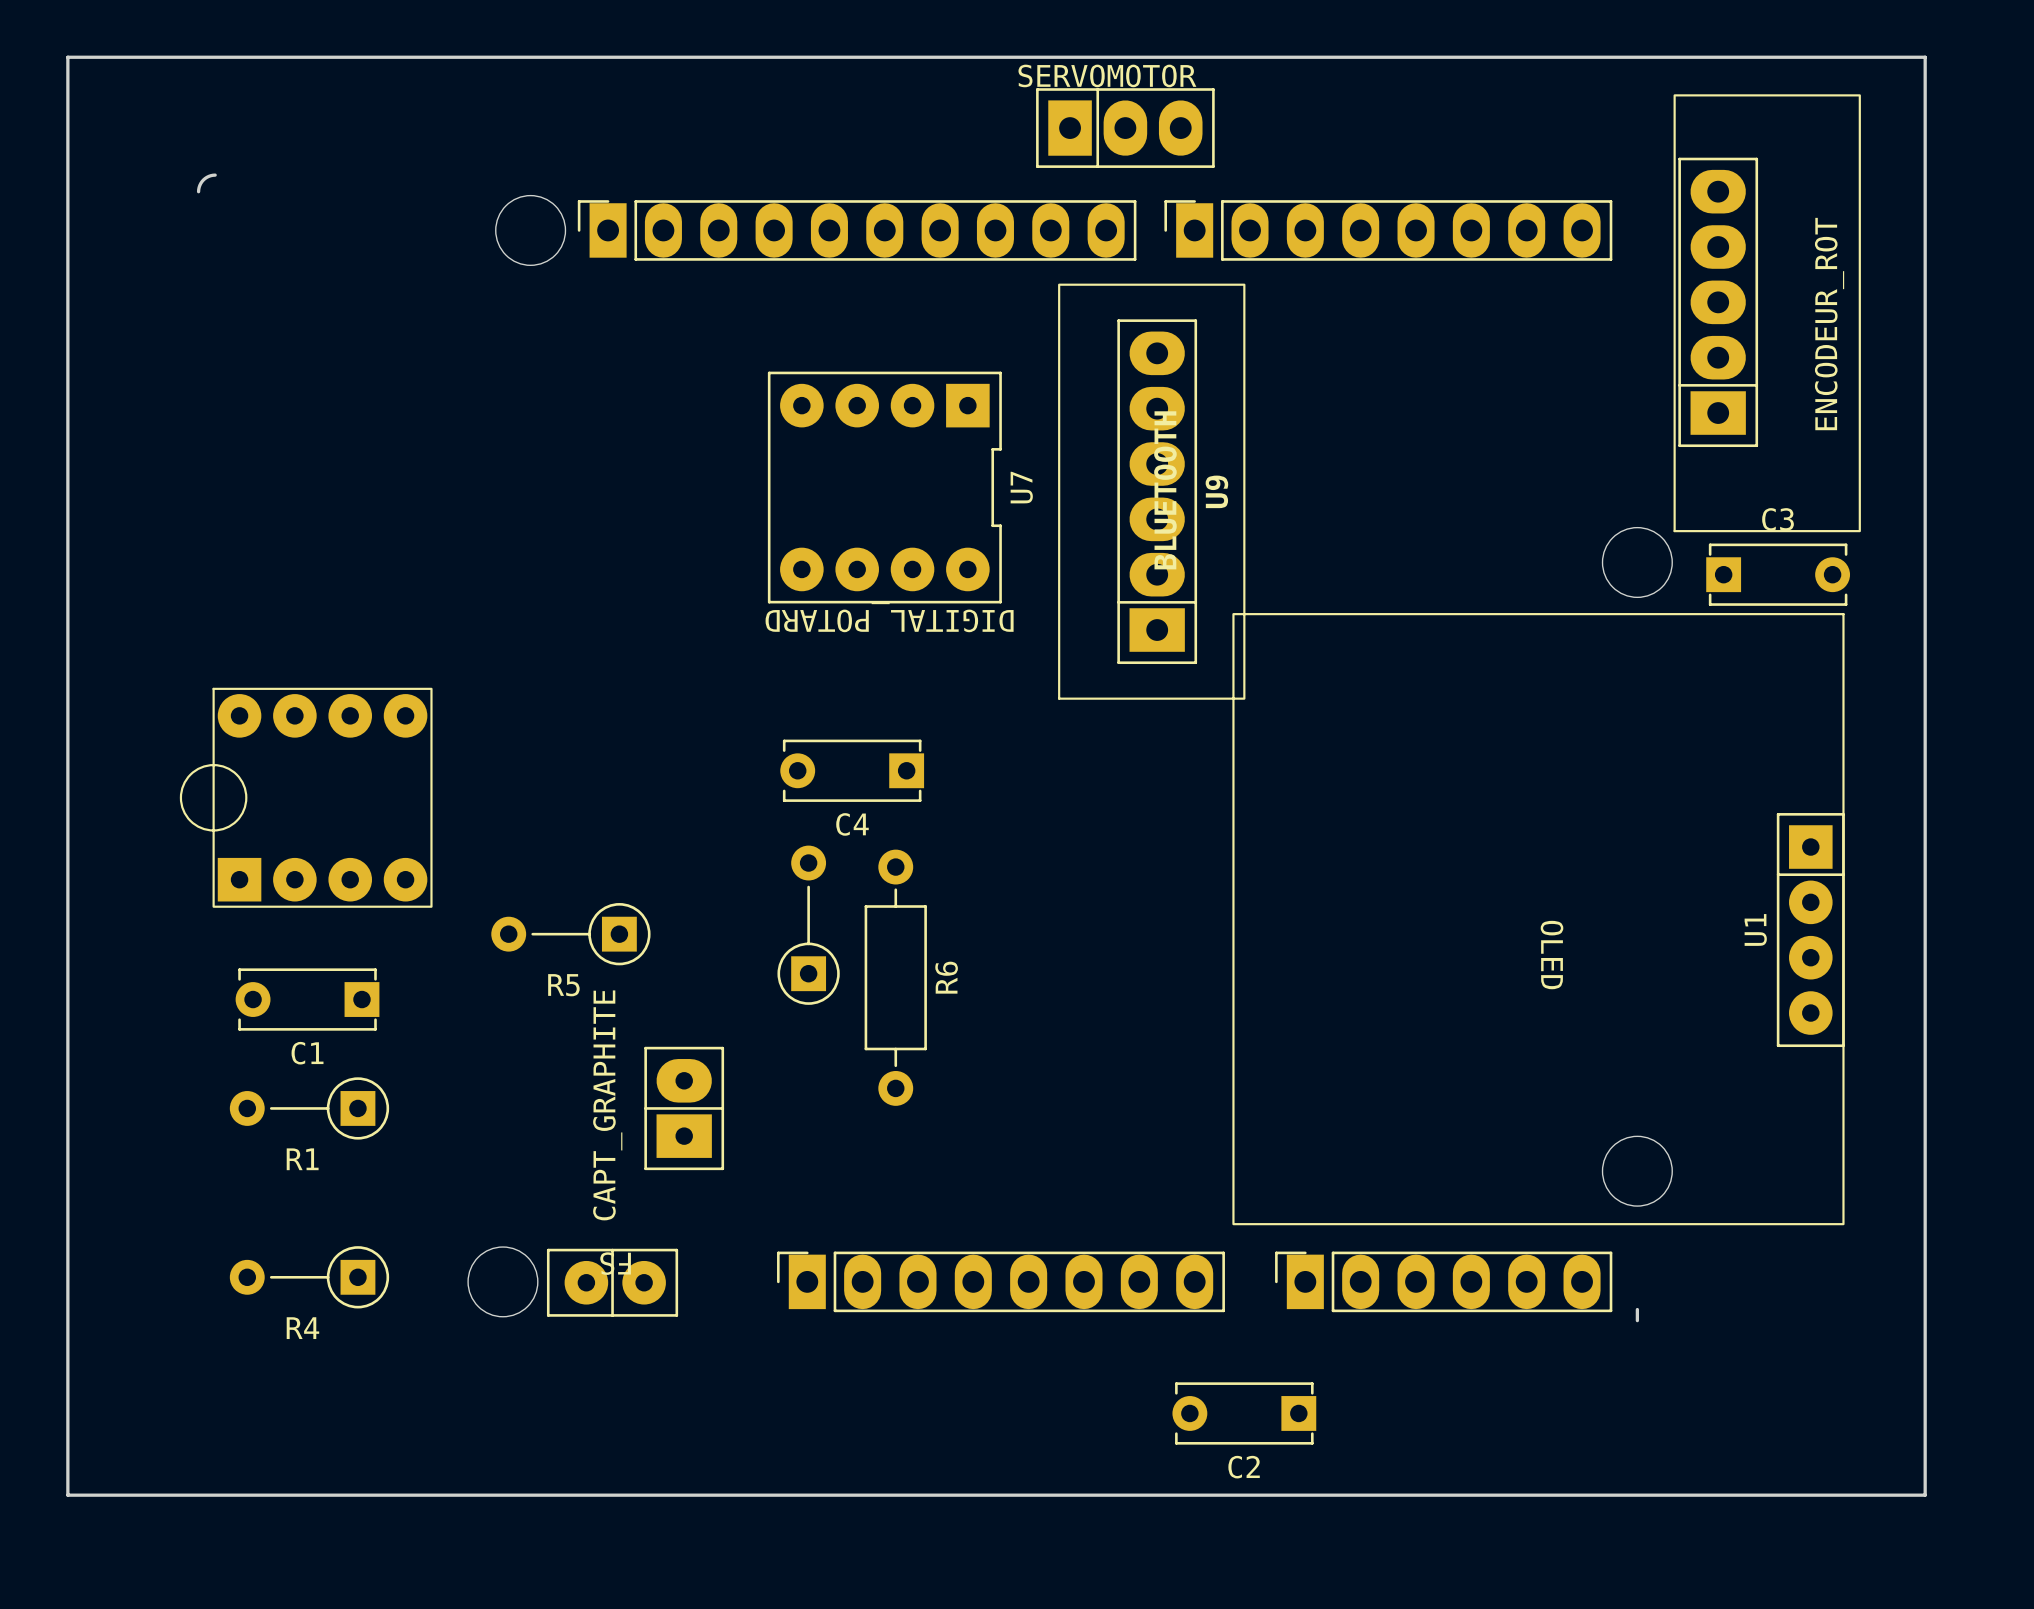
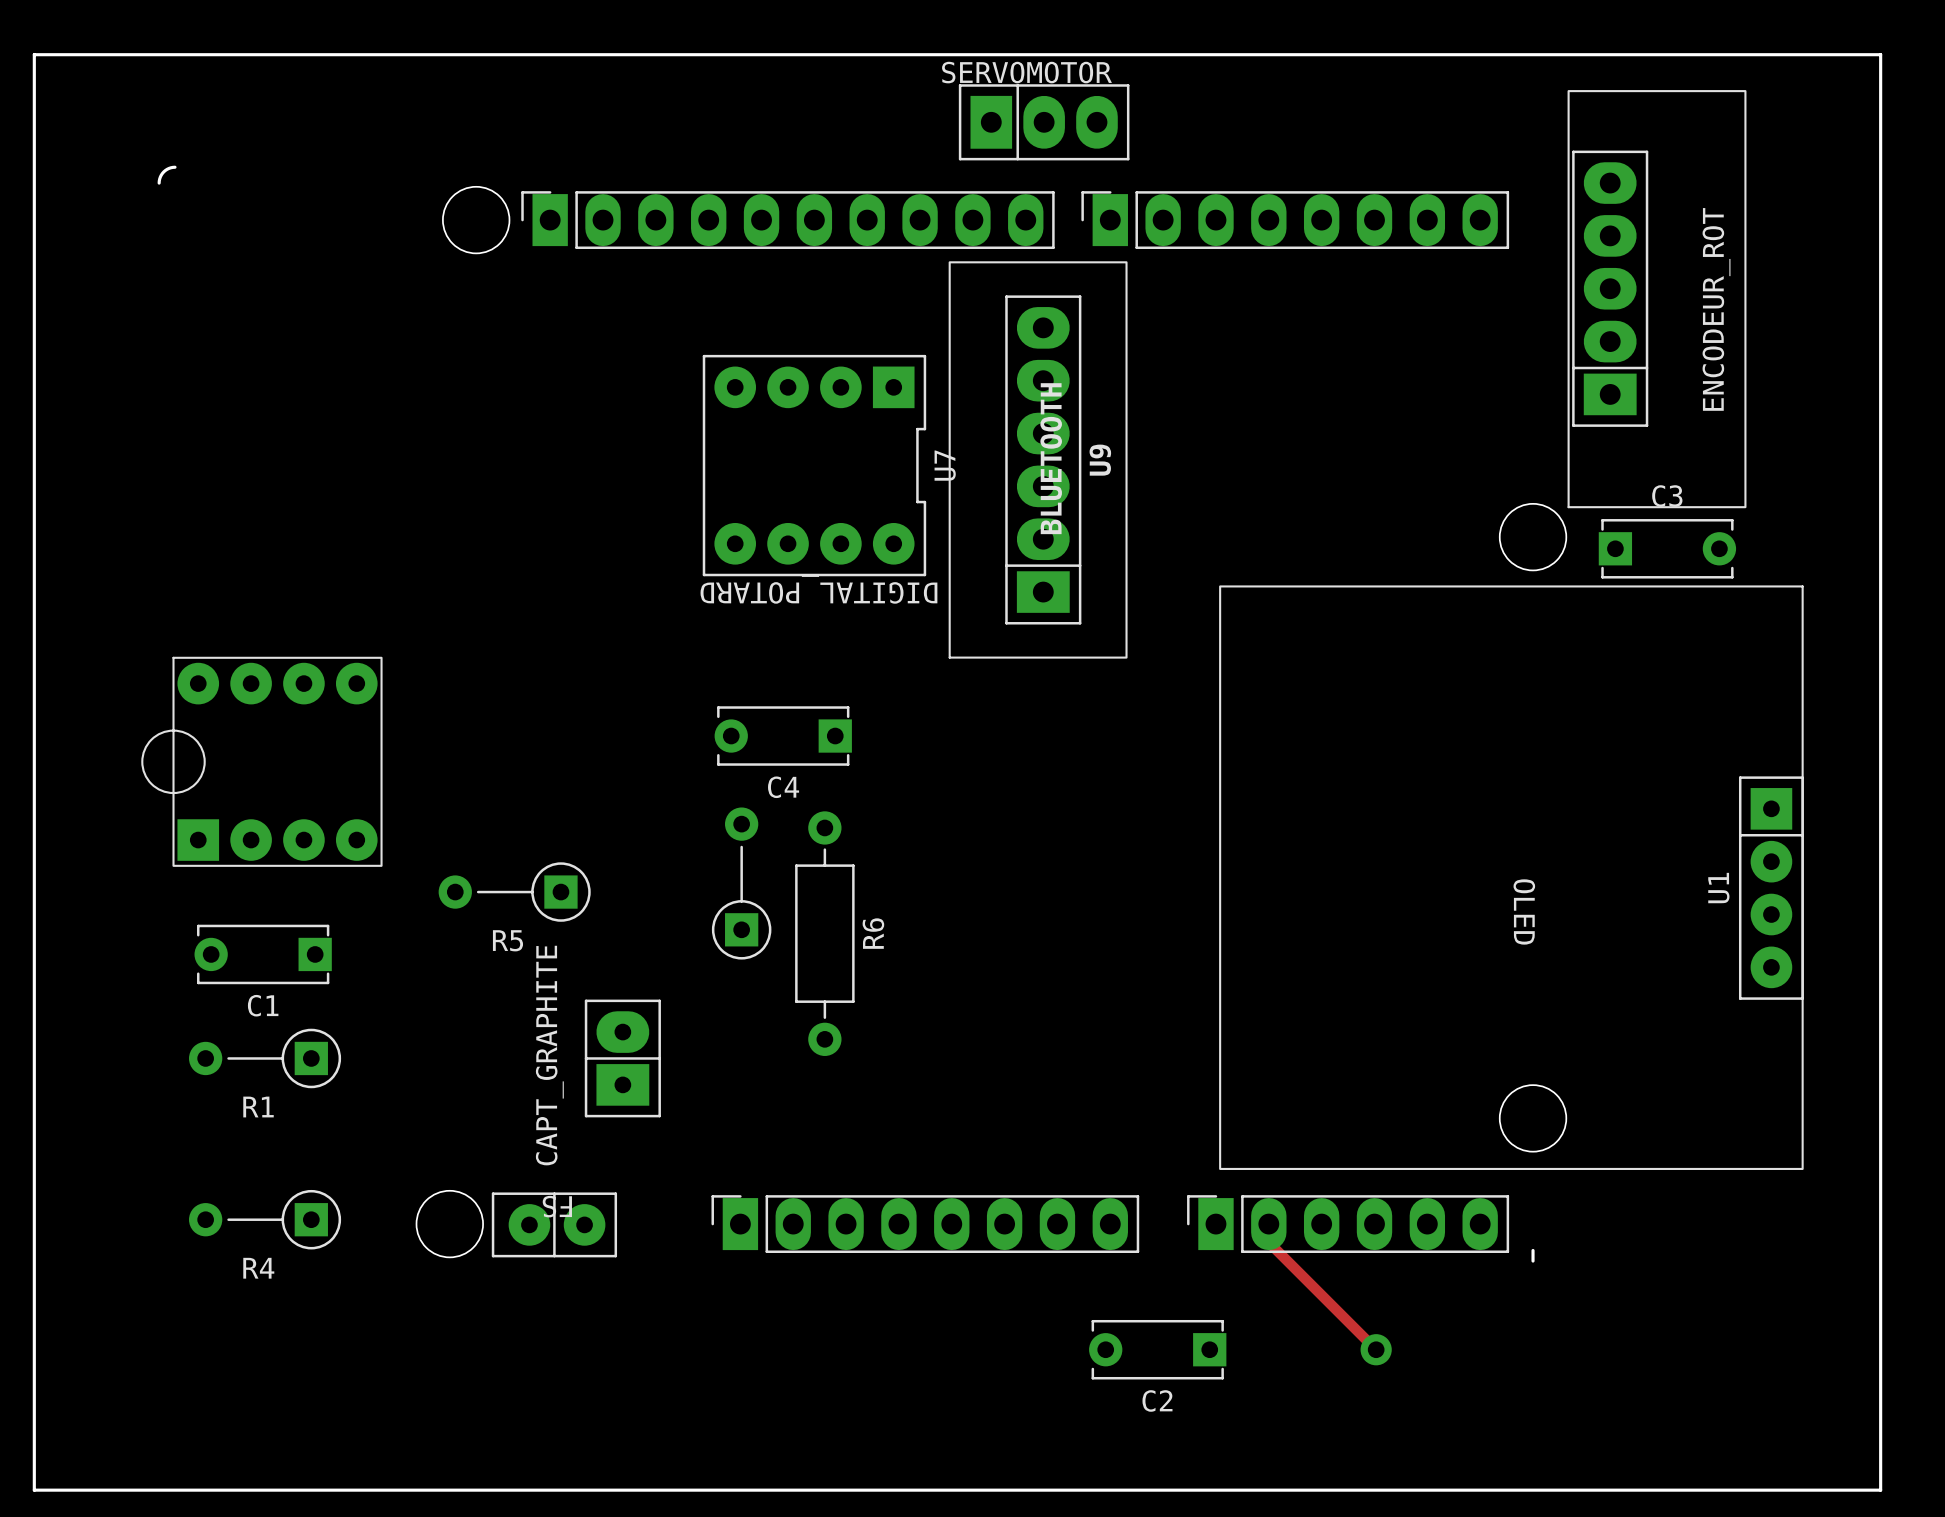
board edge: (1925, 57) (1925, 1495) (67, 1495) -> (1807, 54) (1880, 54) (1880, 1490) (34, 1490) (34, 1427)
U9 position: (1151, 491) -> (1038, 459)
U1 position: (1538, 919) -> (1511, 877)
track: none -> (1268, 1224) (1268, 1242) (1376, 1349)
via: none -> (1376, 1349)

